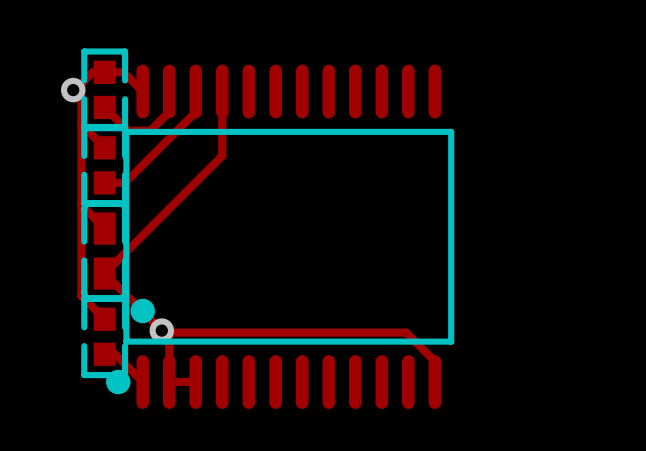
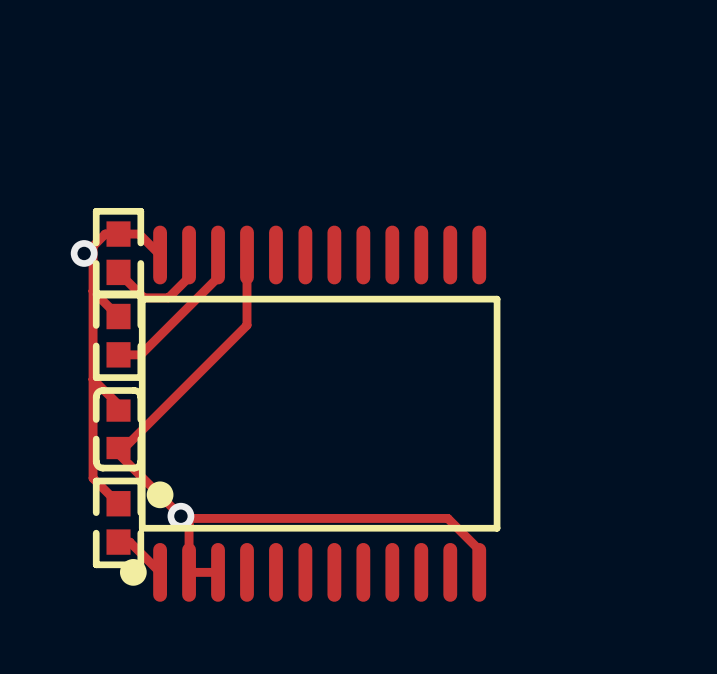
part footprint: [81, 200, 129, 302] -> [92, 387, 145, 472]

